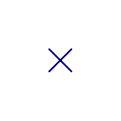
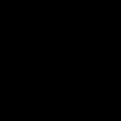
no-connect mark: (60, 60) -> none

